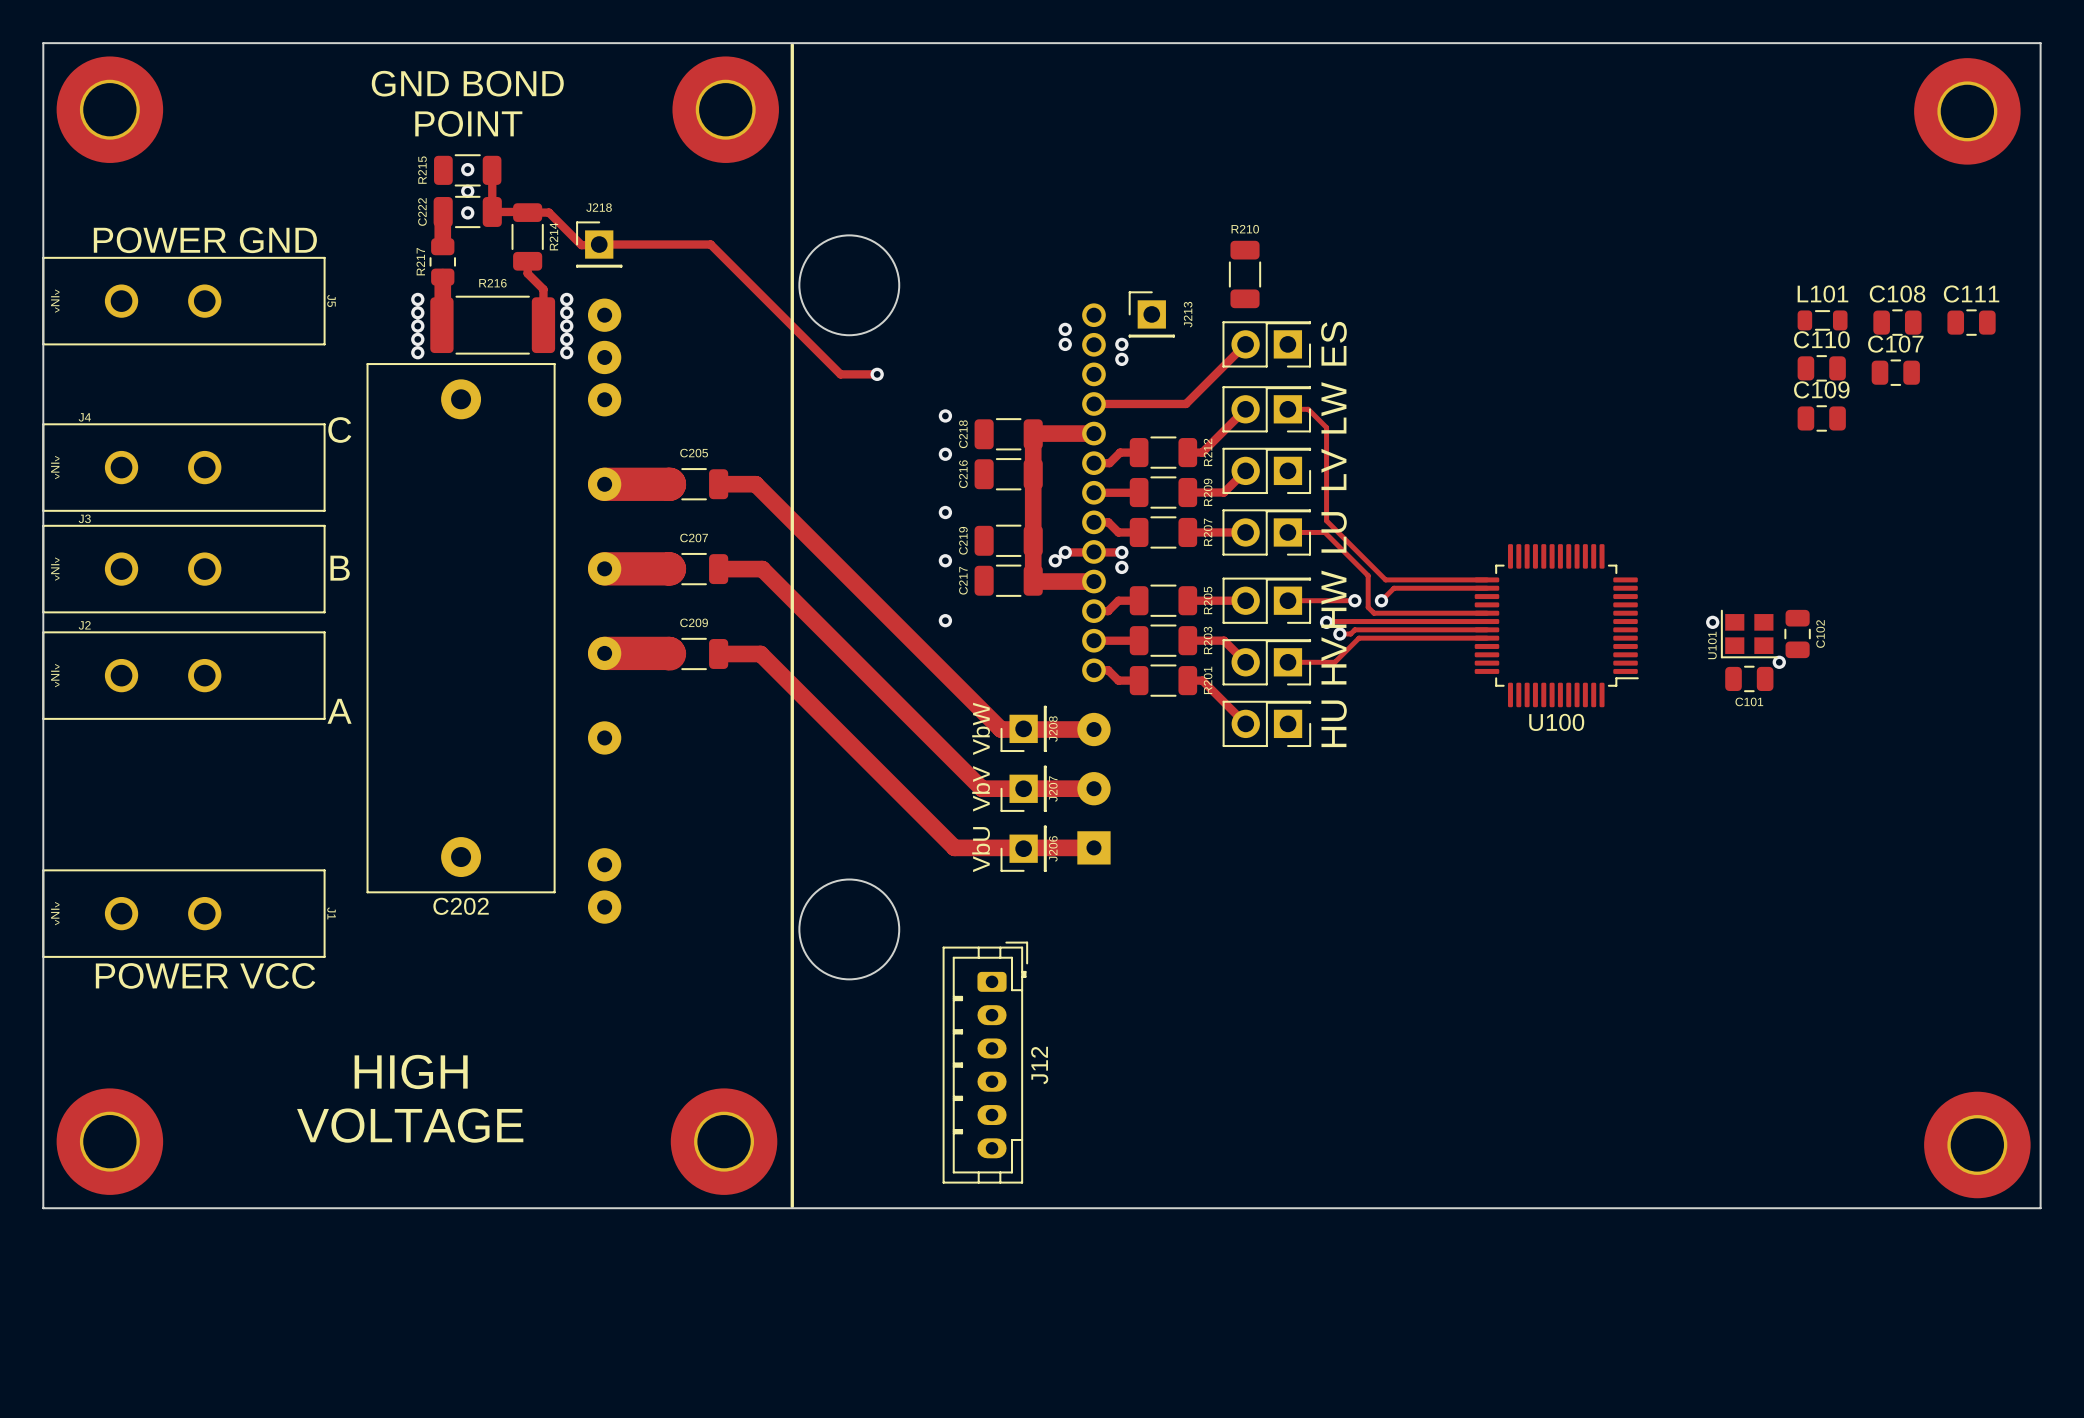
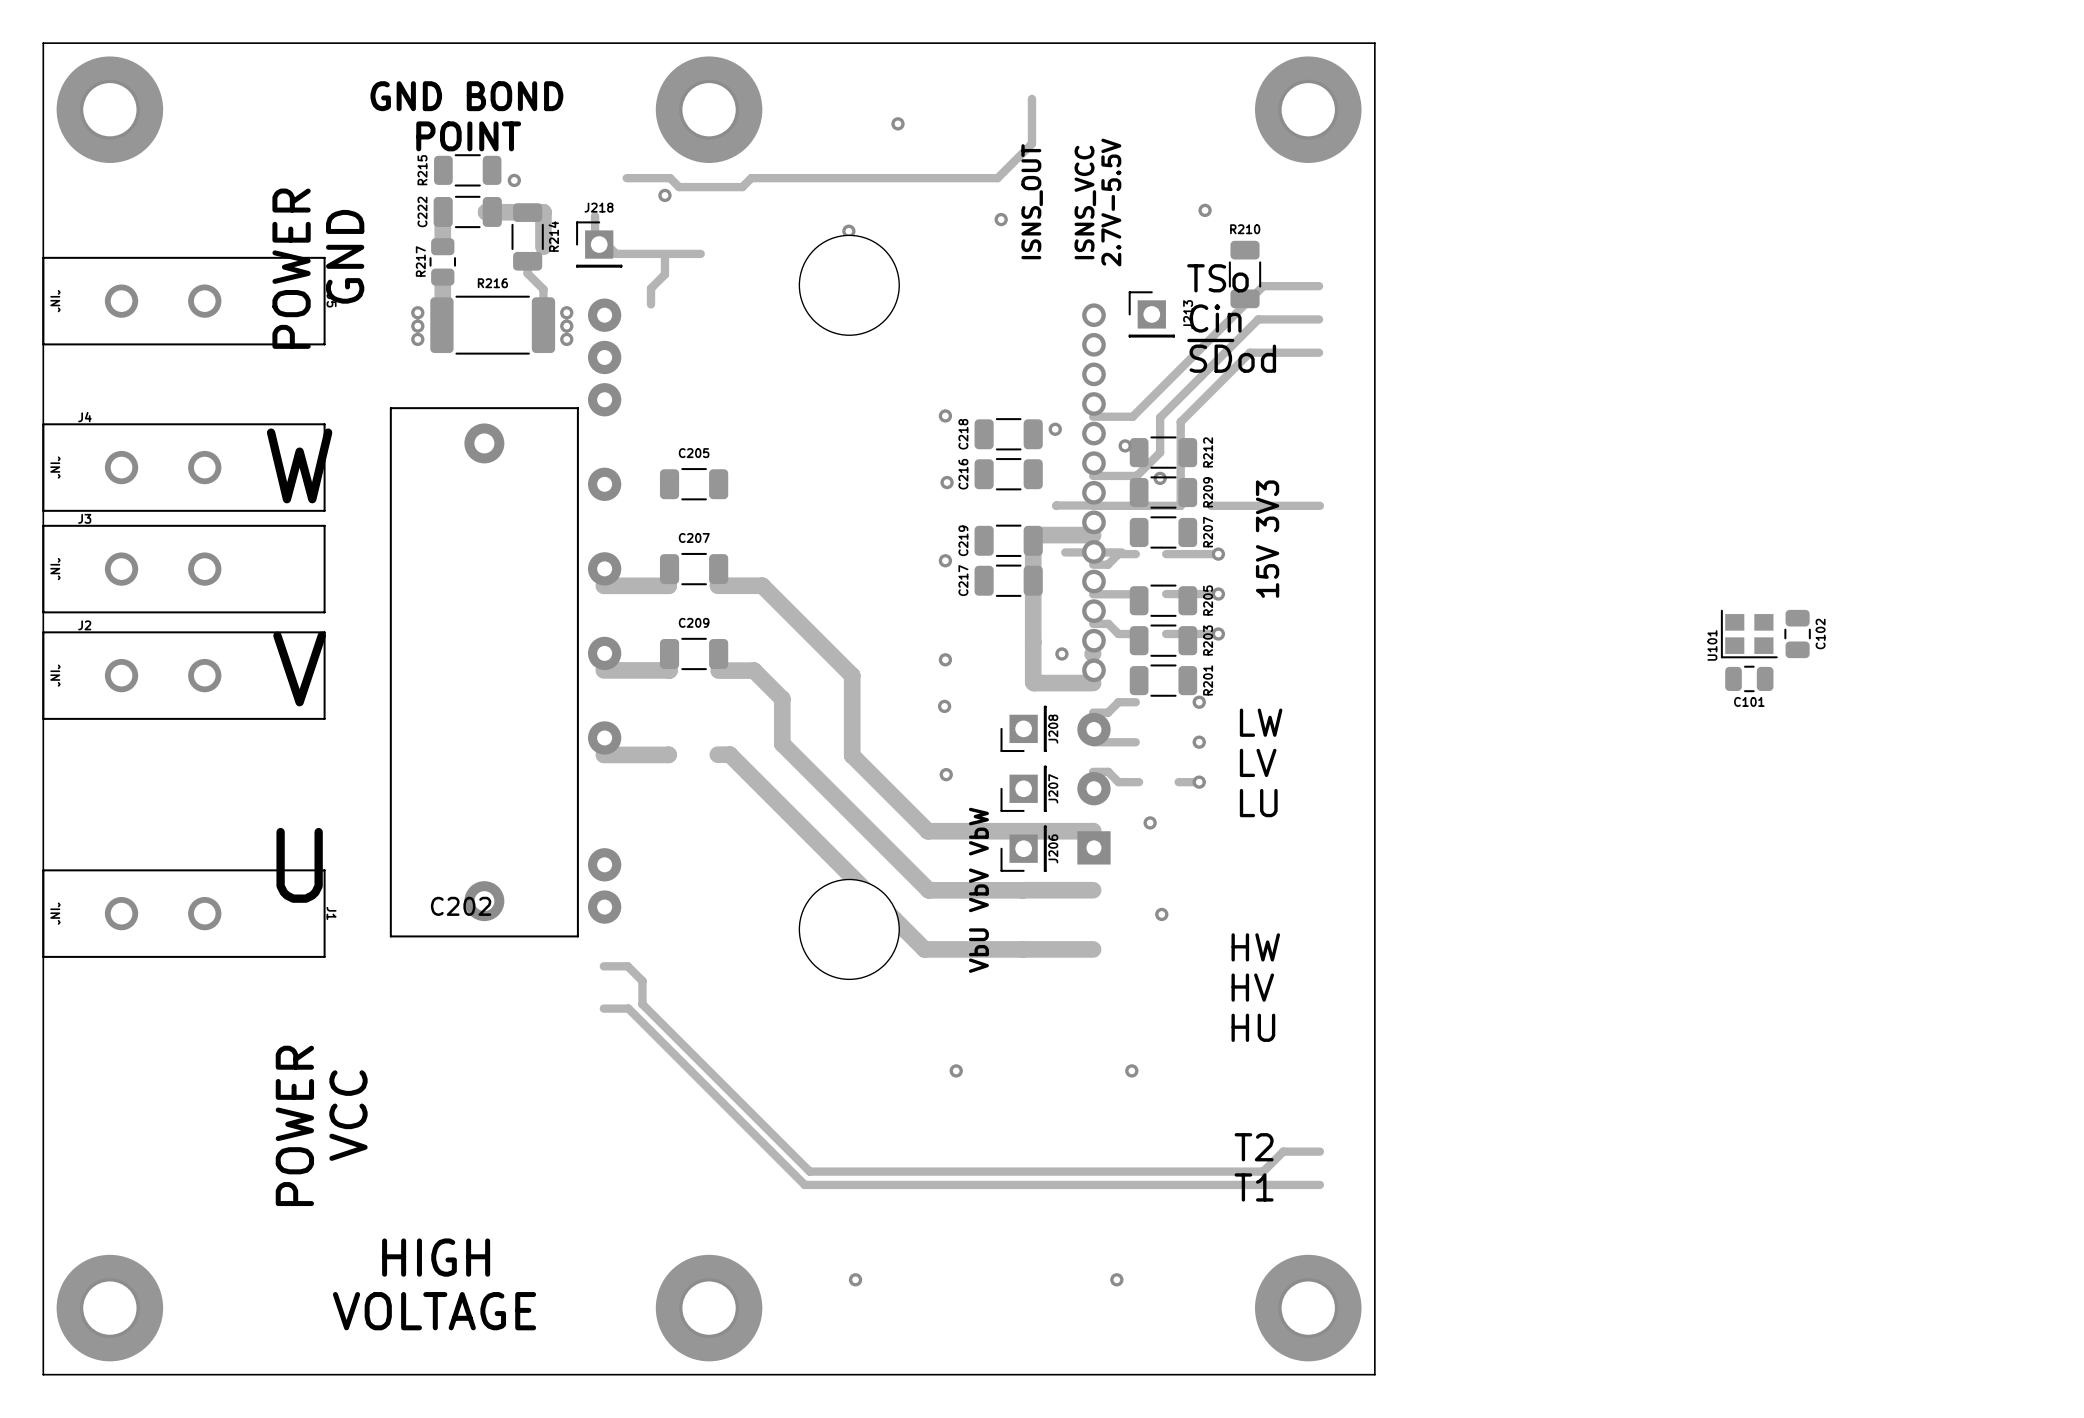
board edge: (1374, 43) (2040, 43) (2040, 1208) (43, 1208) -> (1374, 43) (1374, 1374) (43, 1374) (43, 1208)
line: (792, 44) (792, 1206) -> none
text position: GND BOND (467, 83) -> GND BOND (466, 96)
track: none -> (1031, 98) (1031, 143) (997, 178) (751, 178) (742, 187) (679, 187) (670, 178) (626, 178)
part position: (725, 109) -> (709, 109)
part: none -> (1308, 109)
part: (1967, 111) -> none
text position: POINT (468, 123) -> POINT (468, 136)
via: none -> (897, 123)
via: (467, 169) -> none
track: (492, 170) (492, 211) (548, 212) (581, 245) (710, 244) (840, 374) (877, 374) -> none
via: none -> (514, 180)
via: (467, 191) -> none
via: none -> (664, 195)
text: none -> ISNS_OUT (1032, 201)
text: none -> ISNS_VCC (1085, 202)
text: none -> 2.7V-5.5V (1111, 202)
via: none -> (1205, 210)
via: (467, 212) -> none
track: none -> (486, 212) (543, 212) (543, 246)
track: none -> (595, 216) (595, 232) (616, 253) (700, 253)
via: none -> (1001, 219)
via: none -> (848, 231)
text: POWER GND (205, 240) -> none
track: none -> (664, 254) (664, 274) (651, 288) (651, 304)
text: none -> GND (345, 256)
text: none -> POWER (291, 268)
text: none -> TSo (1217, 278)
track: none -> (1319, 286) (1263, 286) (1132, 416) (1093, 416)
via: (417, 299) -> none
via: (566, 299) -> none
text: none -> Cin (1215, 318)
track: none -> (1319, 319) (1258, 319) (1160, 417) (1160, 452) (1136, 475) (1093, 475)
L101: (1822, 320) -> none
C108: (1897, 322) -> none
C111: (1971, 322) -> none
via: (1065, 329) -> none
text: ES (1333, 343) -> none
via: (1065, 344) -> none
via: (1121, 344) -> none
track: (1245, 344) (1186, 403) (1093, 403) -> none
part: (1266, 344) -> none
via: (417, 352) -> none
via: (566, 352) -> none
track: none -> (1319, 352) (1250, 352) (1180, 422) (1180, 505) (1056, 505)
text: none -> ~{SD}od (1231, 355)
via: (1121, 359) -> none
C110: (1821, 368) -> none
C107: (1895, 372) -> none
via: (877, 374) -> none
text rotation: 0° (1333, 407) -> 90° clockwise (1261, 722)
text position: LW (1333, 407) -> LW (1261, 722)
track: (1245, 409) (1202, 452) (1187, 452) -> none
part: (1266, 409) -> none
track: (1287, 409) (1308, 409) (1326, 427) (1326, 520) (1385, 579) (1486, 579) -> none
C109: (1821, 418) -> none
via: none -> (1055, 429)
text: C (339, 430) -> none
track: (1093, 433) (1033, 434) (1033, 535) -> (1093, 535) (1033, 535)
via: none -> (1125, 445)
track: (1139, 452) (1120, 452) (1109, 463) (1093, 463) -> none
via: (945, 454) -> none
text: none -> W (299, 465)
text rotation: 0° (1333, 469) -> 90° clockwise (1258, 762)
text position: LV (1333, 469) -> LV (1258, 762)
track: (1245, 470) (1224, 492) (1187, 492) -> none
part: (1266, 470) -> none
via: none -> (1160, 478)
via: none -> (947, 482)
track: (604, 484) (669, 484) -> none
track: (718, 484) (755, 484) (1000, 729) (1093, 729) -> none
track: (1093, 492) (1138, 492) -> none
track: none -> (1211, 505) (1319, 505)
text: none -> 3V3 (1267, 506)
via: (945, 512) -> none
track: (1093, 522) (1108, 522) (1118, 532) (1139, 532) -> none
track: (1187, 532) (1245, 532) -> none
part: (1266, 532) -> none
track: (1287, 532) (1324, 532) (1368, 575) (1368, 607) (1374, 613) (1486, 613) -> none
text rotation: 0° (1334, 532) -> 90° clockwise (1258, 803)
text position: LU (1334, 532) -> LU (1258, 803)
via: (1065, 552) -> none
via: (1121, 552) -> none
track: none -> (1135, 554) (1118, 554) (1107, 564) (1093, 564)
track: none -> (1166, 554) (1218, 554)
via: none -> (1218, 554)
via: (1055, 560) -> none
via: (1121, 567) -> none
text: B (340, 568) -> none
track: (604, 568) (669, 568) -> (603, 585) (668, 585)
track: (718, 569) (762, 569) (981, 788) (1093, 788) -> none
text: none -> 15V (1267, 571)
track: (1033, 580) (1093, 581) -> (1033, 580) (1033, 682) (1093, 683)
track: none -> (717, 585) (762, 585) (852, 675) (852, 755) (927, 831) (1092, 831)
track: (1486, 588) (1393, 588) (1381, 600) -> none
track: none -> (1093, 594) (1135, 594)
track: none -> (1166, 594) (1218, 594)
via: none -> (1218, 594)
text rotation: 0° (1333, 599) -> 90° clockwise (1255, 947)
text position: HW (1333, 599) -> HW (1255, 947)
track: (1139, 600) (1118, 600) (1108, 611) (1093, 611) -> none
track: (1187, 600) (1245, 600) -> none
part: (1266, 600) -> none
track: (1287, 600) (1354, 600) -> none
via: (1354, 600) -> none
via: (1381, 600) -> none
via position: (945, 620) -> (945, 659)
track: (1486, 621) (1326, 622) -> none
via: (1326, 622) -> none
via: (1712, 622) -> none
track: none -> (1093, 623) (1108, 623) (1118, 634) (1135, 634)
U100: (1556, 625) -> none
C202 position: (461, 628) -> (484, 672)
track: (1486, 629) (1354, 629) (1350, 634) (1339, 634) -> none
track: none -> (1166, 634) (1218, 634)
via: none -> (1218, 634)
via: (1339, 634) -> none
track: (1486, 638) (1359, 638) (1334, 662) (1287, 662) -> none
track: (1093, 640) (1139, 640) -> none
track: (1187, 640) (1224, 640) (1245, 662) -> none
track: (604, 653) (669, 653) -> none
track: (718, 653) (760, 653) (954, 847) (1093, 847) -> none
via: none -> (1061, 653)
track: none -> (1093, 653) (1092, 653)
text rotation: 0° (1333, 660) -> 90° clockwise (1252, 987)
text position: HV (1333, 660) -> HV (1252, 987)
part: (1266, 662) -> none
via: (1779, 662) -> none
text: none -> V (299, 668)
track: none -> (603, 670) (669, 670)
track: none -> (718, 670) (754, 670) (782, 698) (782, 743) (928, 890) (1022, 890)
track: (1093, 670) (1108, 670) (1118, 680) (1139, 680) -> none
track: (1187, 680) (1202, 680) (1245, 723) -> none
track: none -> (1135, 702) (1118, 702) (1108, 712) (1093, 712)
via: none -> (1199, 702)
via: none -> (944, 706)
text: A (339, 711) -> none
part: (1266, 723) -> none
text rotation: 0° (1334, 723) -> 90° clockwise (1253, 1027)
text position: HU (1334, 723) -> HU (1253, 1027)
text position: VbW (981, 728) -> VbW (978, 831)
track: none -> (1093, 742) (1135, 742)
via: none -> (1199, 742)
track: none -> (668, 754) (603, 754)
track: none -> (717, 754) (729, 754) (924, 949) (1093, 949)
track: none -> (1093, 771) (1108, 771) (1118, 782) (1139, 782)
via: none -> (946, 774)
track: none -> (1178, 782) (1199, 782)
via: none -> (1199, 782)
text position: VbV (981, 788) -> VbV (978, 890)
via: none -> (1150, 822)
text position: VbU (981, 849) -> VbU (978, 950)
text: none -> U (299, 865)
track: none -> (1022, 890) (1093, 890)
via: none -> (1161, 914)
track: none -> (603, 966) (627, 966) (642, 981) (642, 1004) (809, 1171) (1263, 1171) (1283, 1151) (1319, 1151)
text: POWER VCC (205, 975) -> none
track: none -> (603, 1008) (628, 1008) (804, 1184) (1319, 1184)
J12: (985, 1062) -> none
via: none -> (956, 1070)
via: none -> (1131, 1070)
text position: HIGH (411, 1071) -> HIGH (436, 1257)
text: none -> VCC (348, 1115)
text: none -> POWER (294, 1125)
text position: VOLTAGE (410, 1125) -> VOLTAGE (434, 1311)
part position: (109, 1141) -> (109, 1308)
part position: (724, 1141) -> (709, 1308)
part: (1977, 1144) -> none
text: none -> T2 (1254, 1147)
text: none -> T1 (1254, 1187)
via: none -> (855, 1279)
via: none -> (1116, 1279)
part: none -> (1308, 1308)

